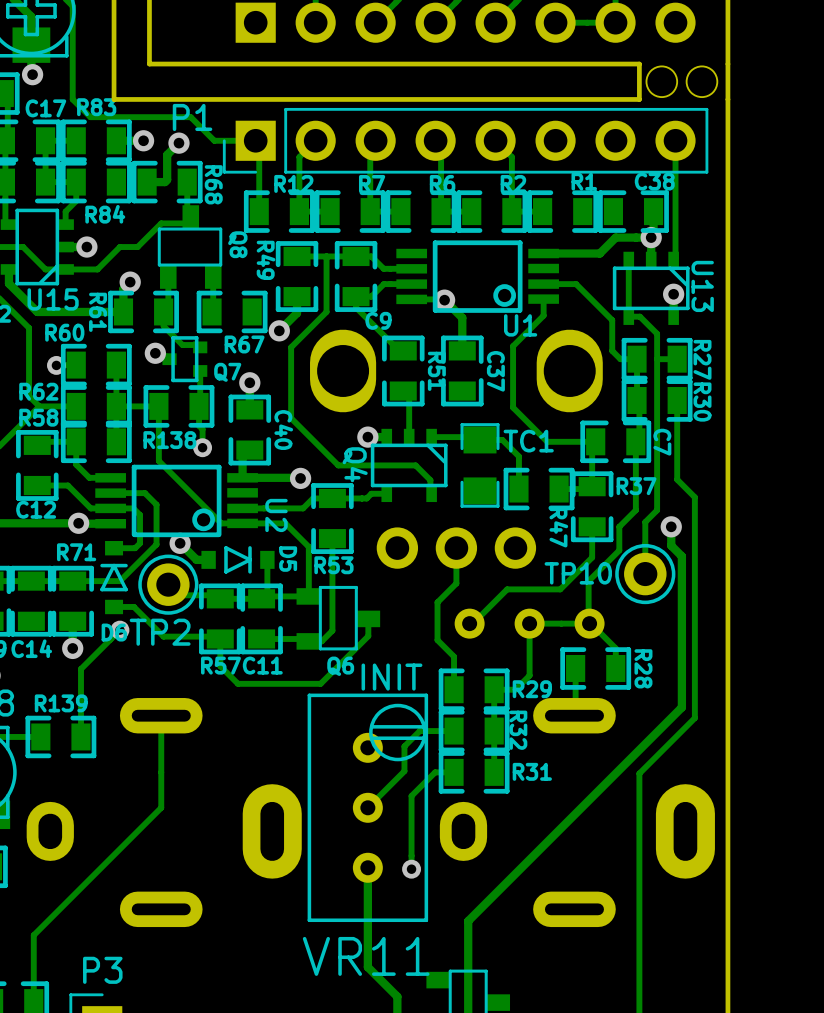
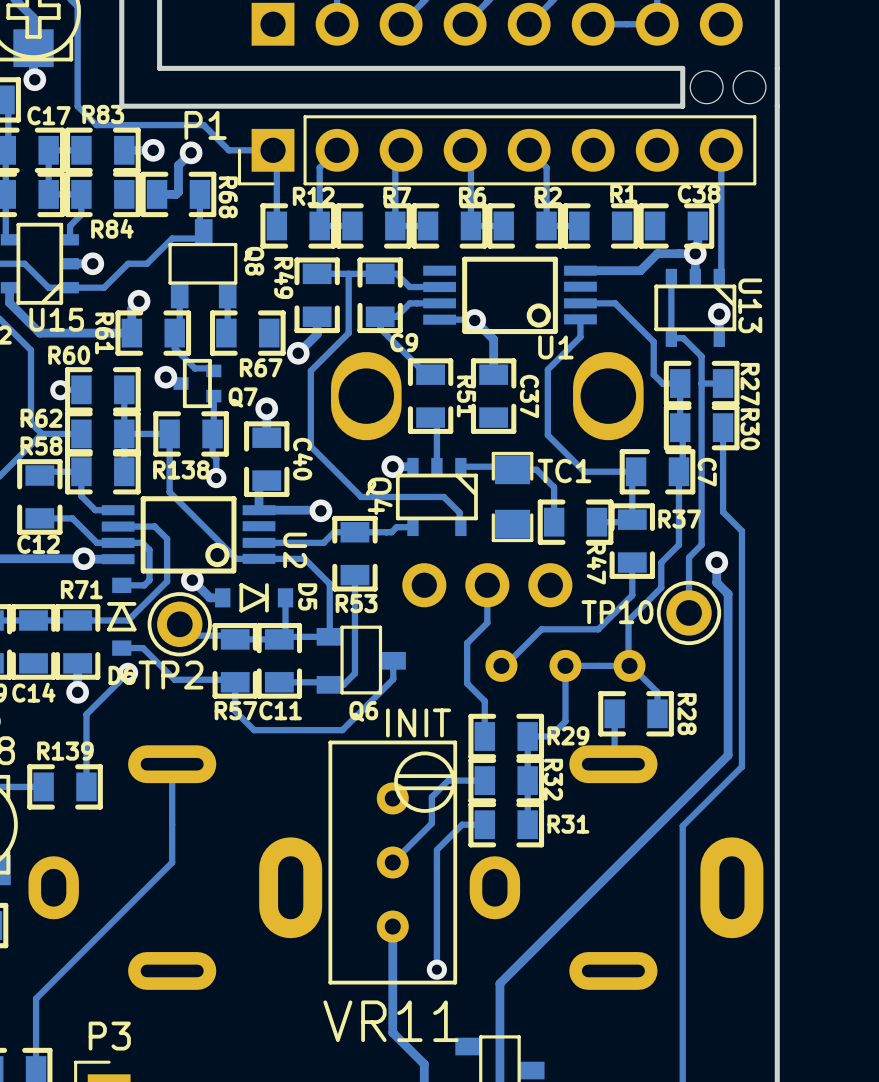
track: (435, 772) (411, 795) (411, 869) -> (464, 824) (462, 824) (436, 849) (436, 969)
via position: (411, 869) -> (436, 969)

